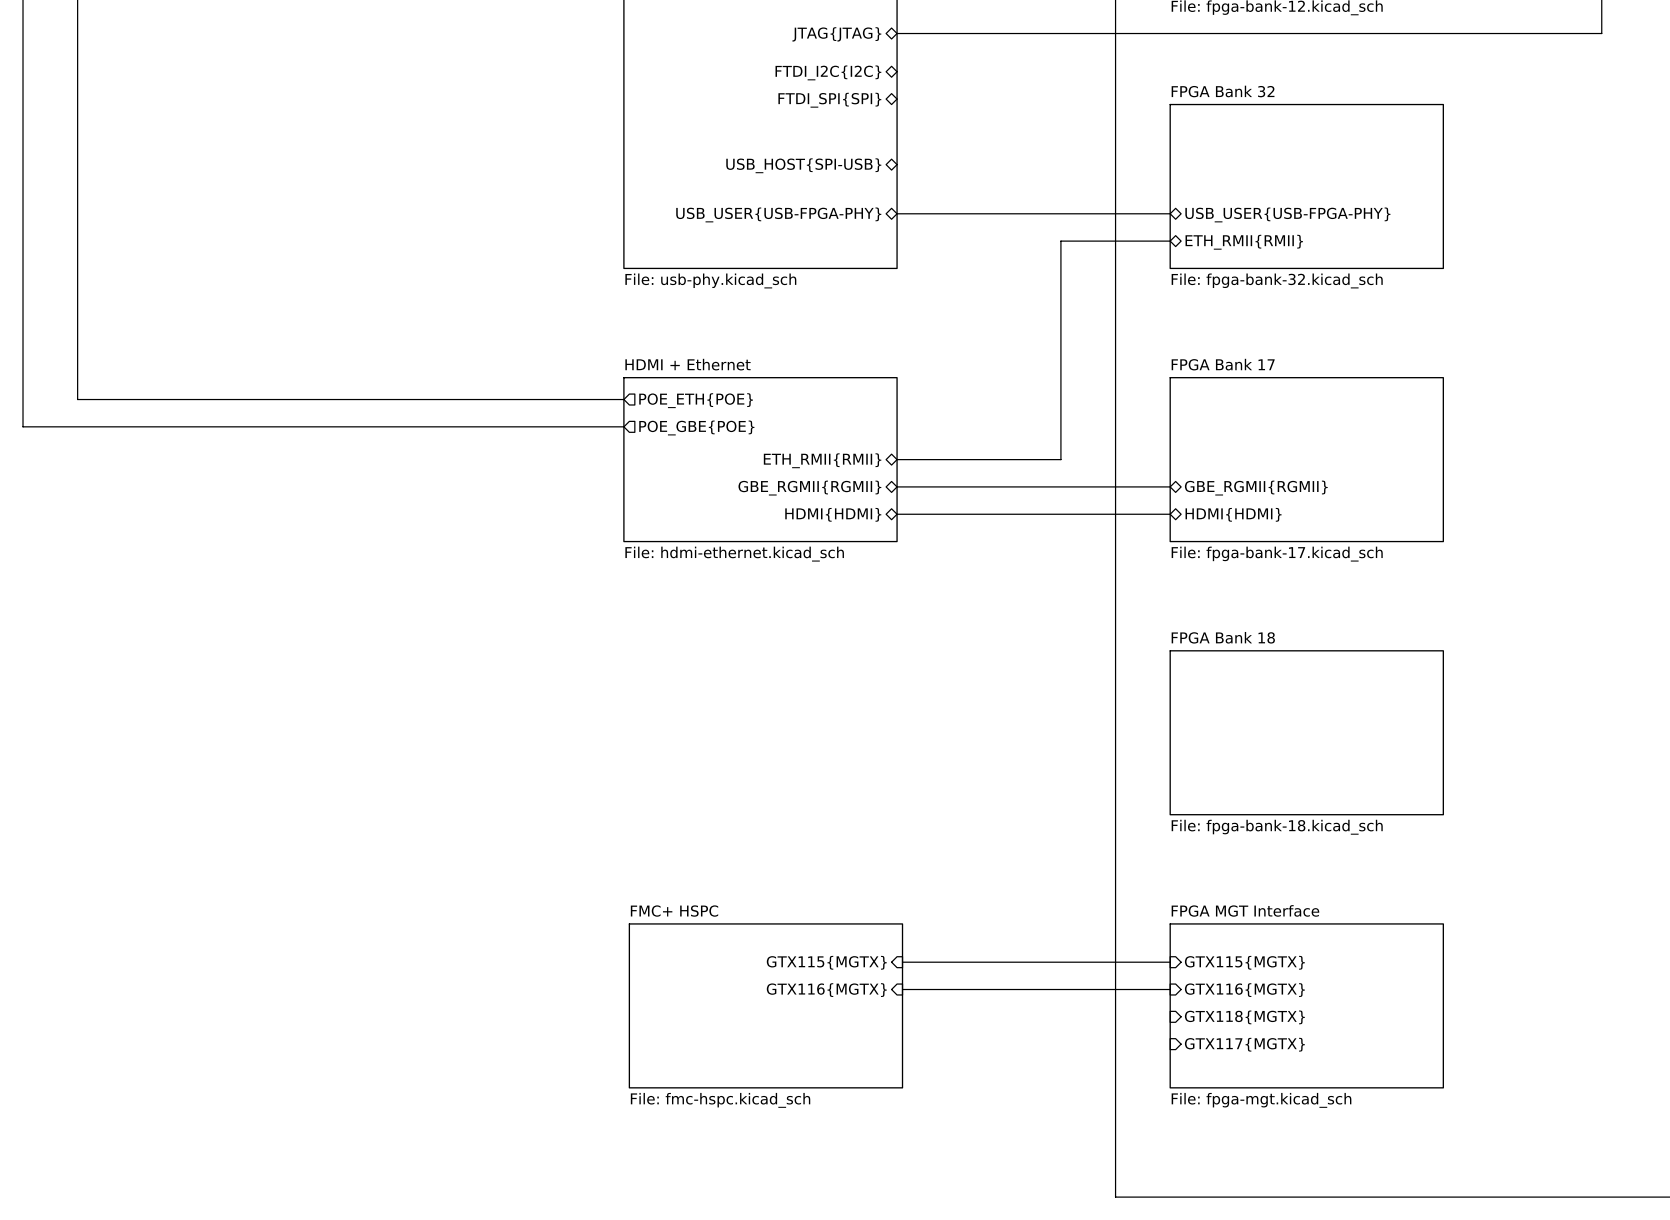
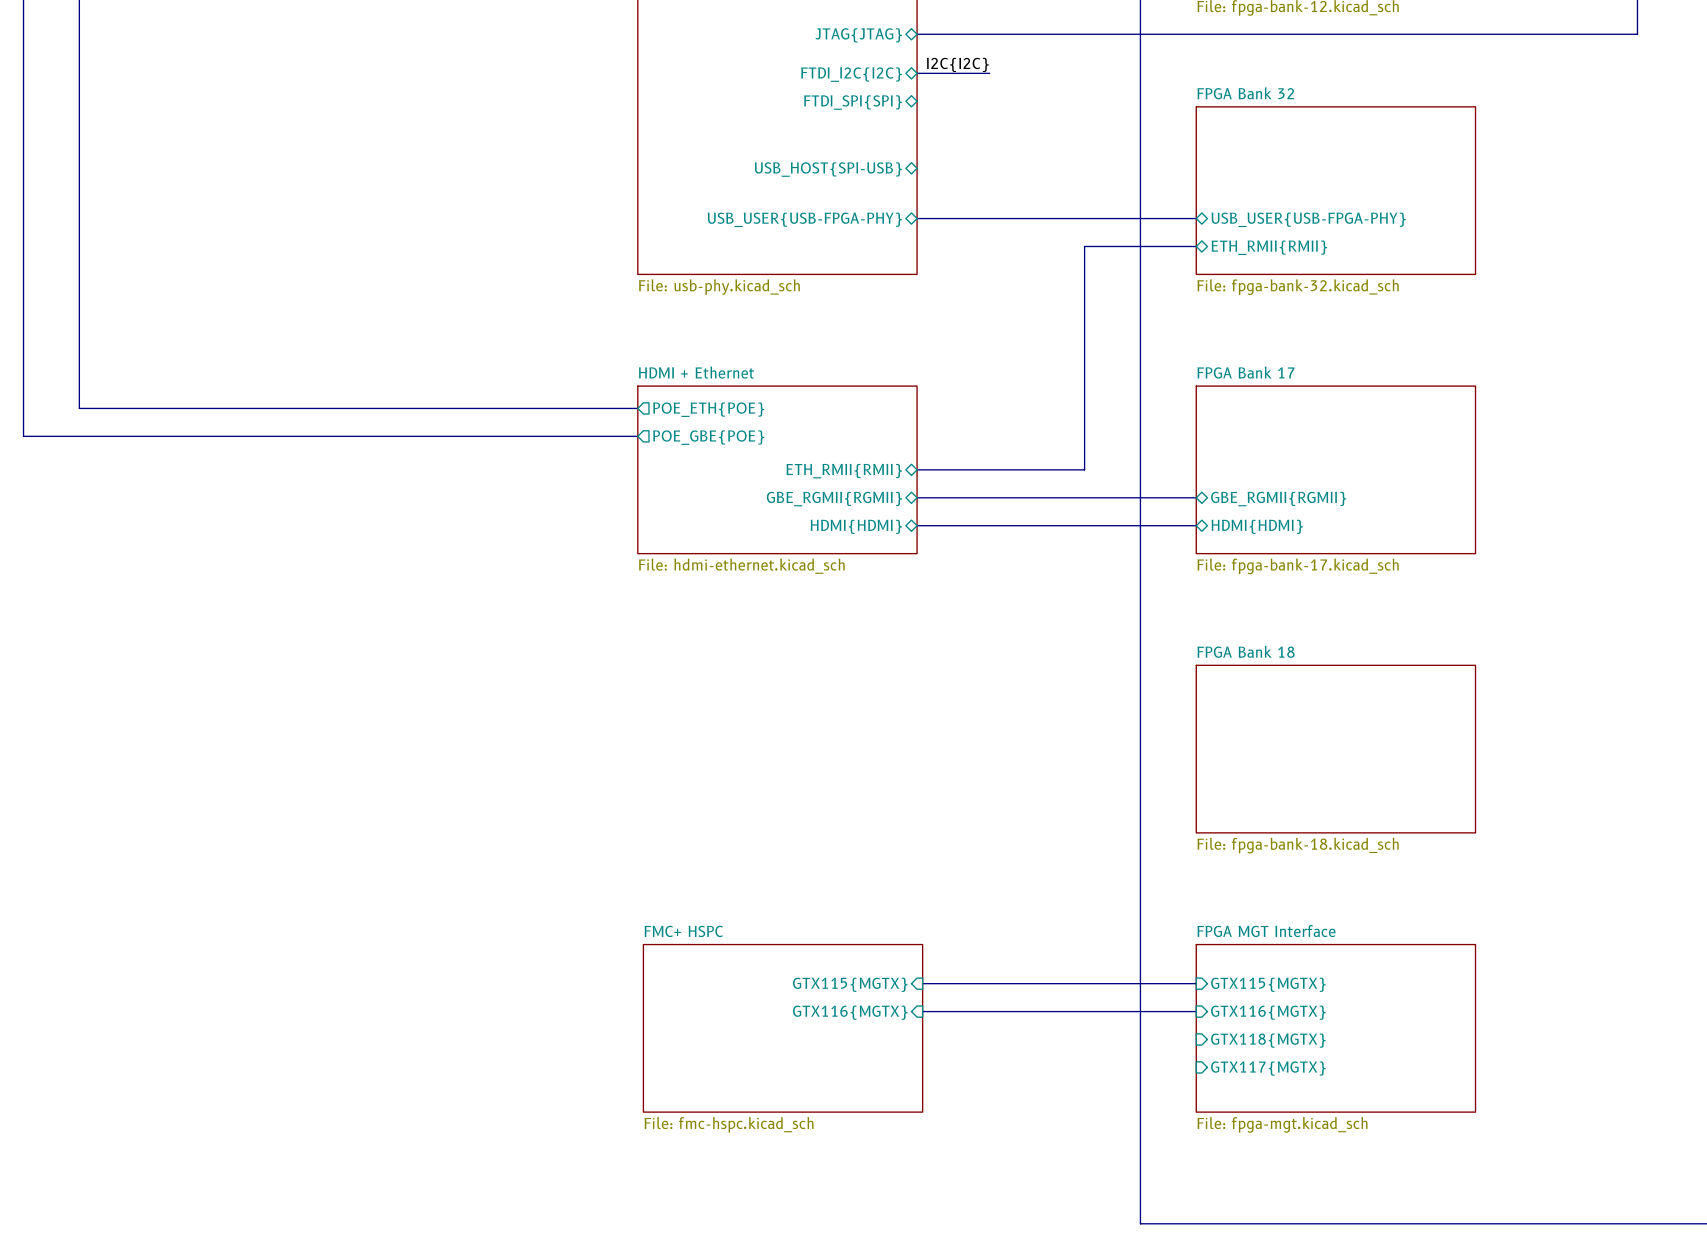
label: none -> I2C{I2C} (957, 64)
bus: none -> (917, 73) (989, 73)

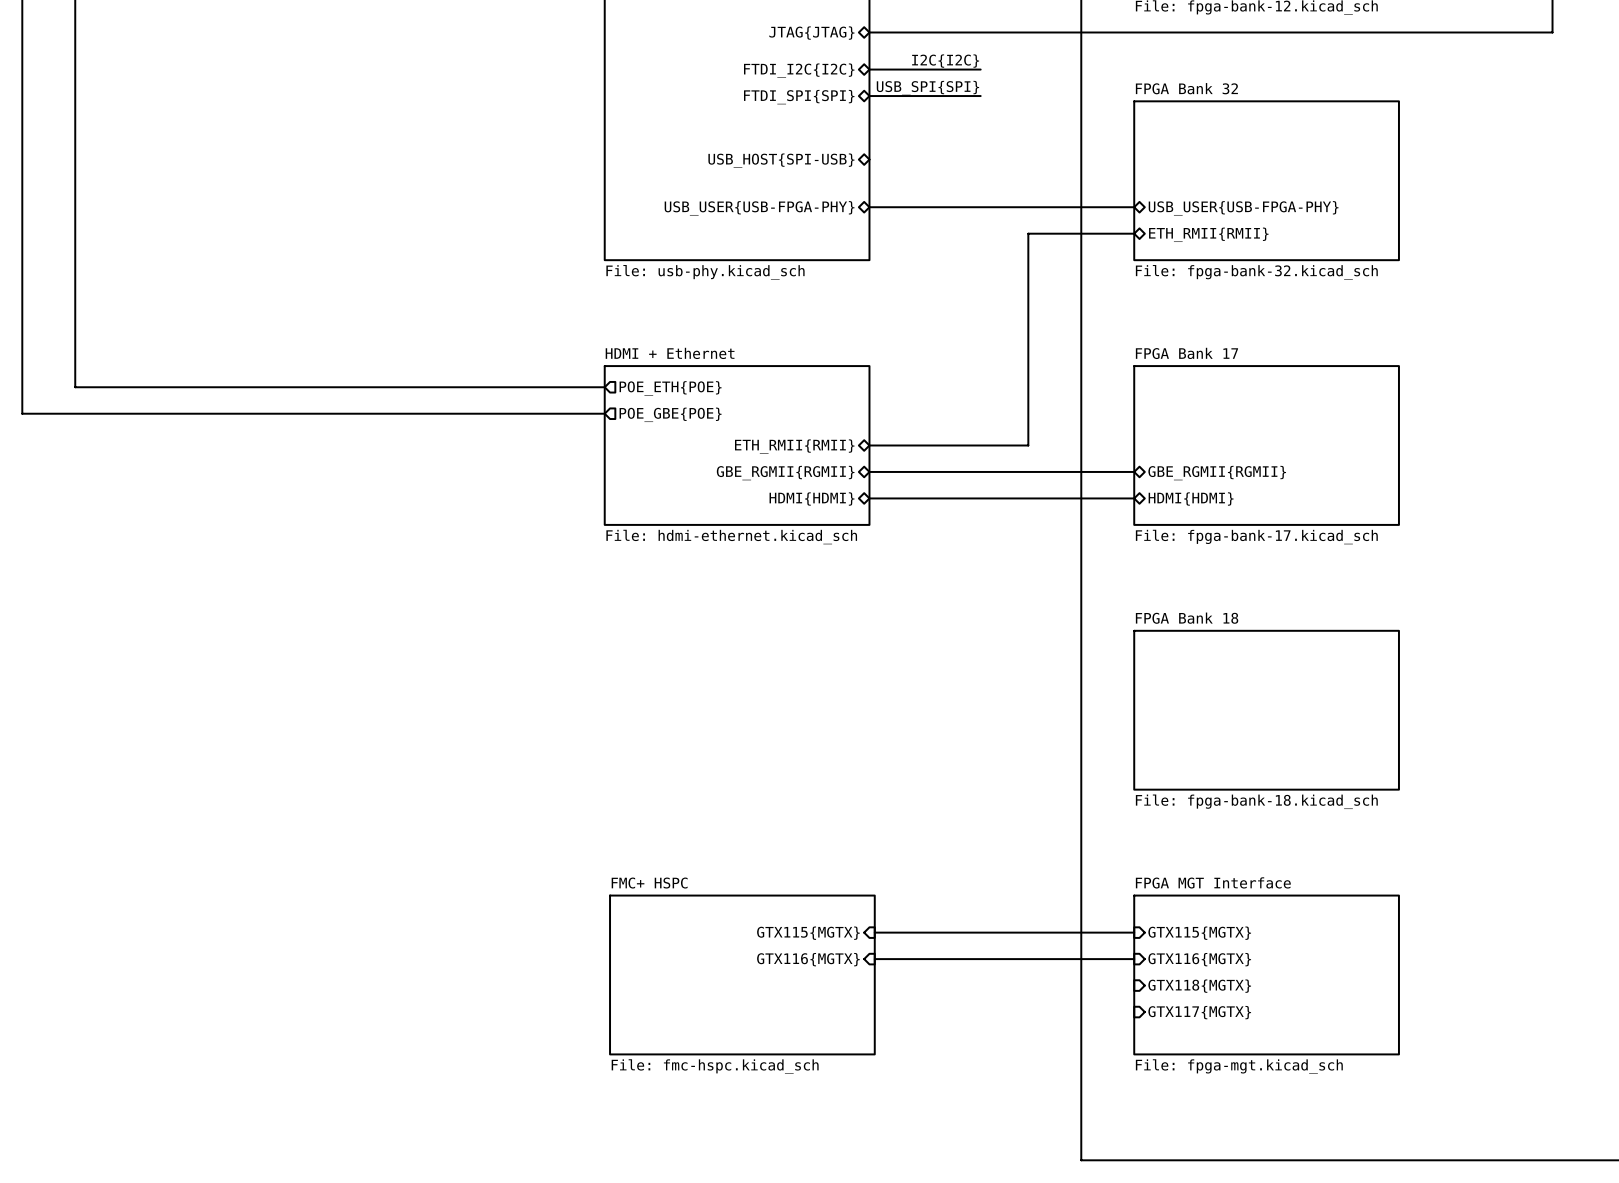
label position: I2C{I2C} (957, 64) -> I2C{I2C} (945, 61)
bus: none -> (938, 69) (980, 69)
label: none -> USB_SPI{SPI} (927, 88)
bus: none -> (869, 96) (980, 96)

